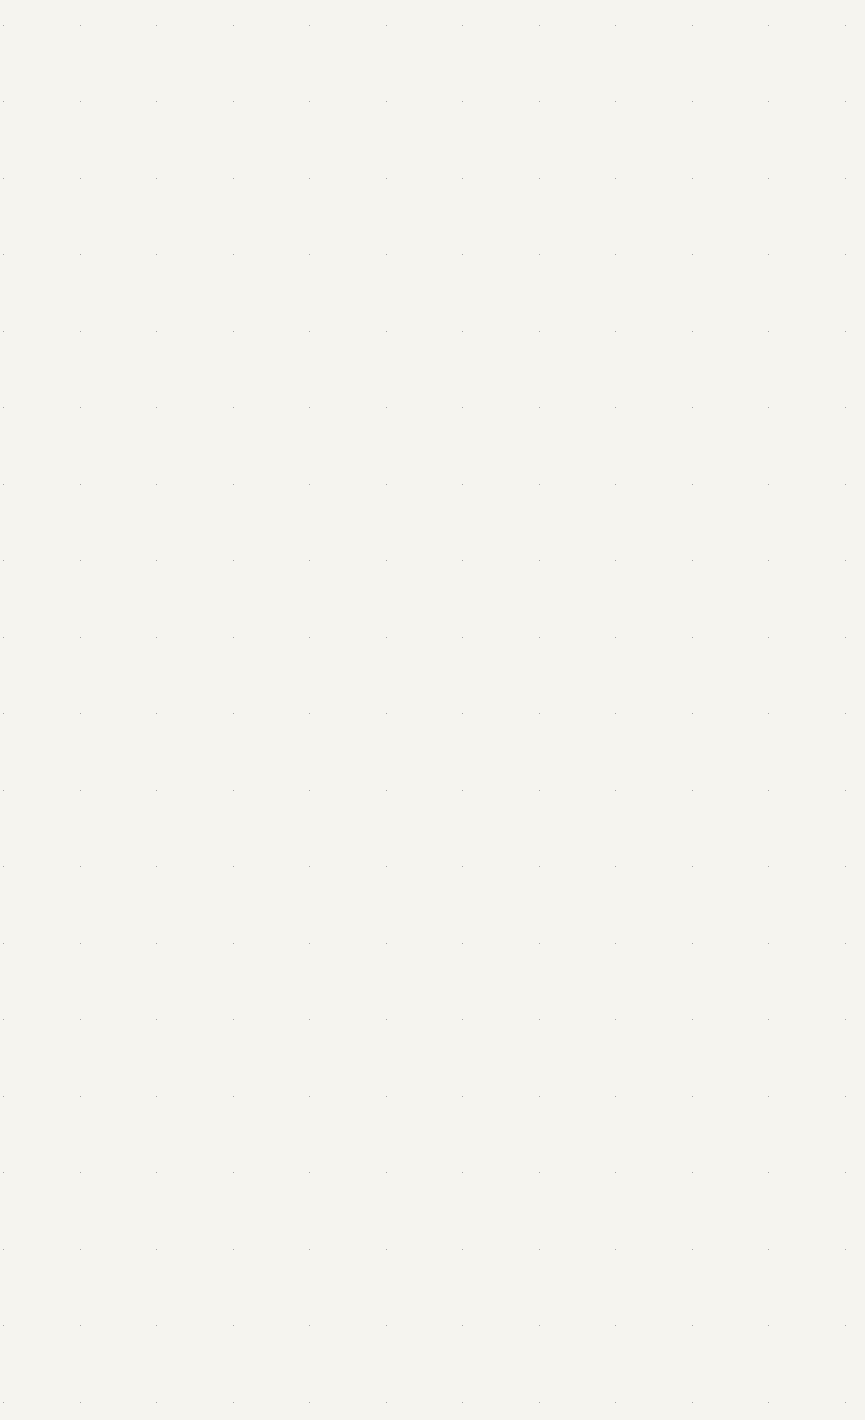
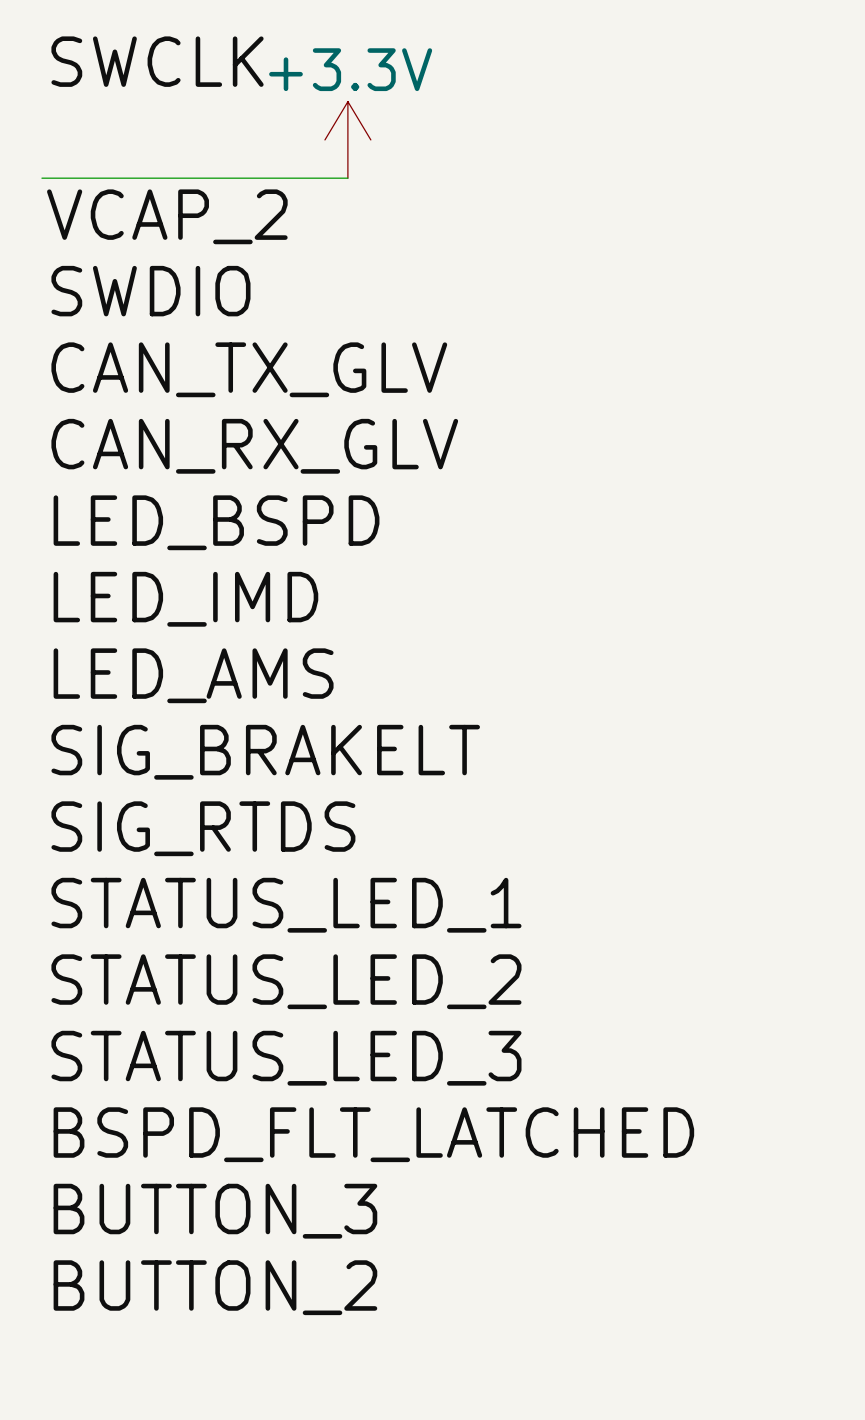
label: none -> SWCLK (157, 61)
power symbol: none -> +3.3V (347, 139)
wire: none -> (41, 178) (347, 178)
label: none -> VCAP_2 (167, 216)
label: none -> SWDIO (150, 291)
label: none -> CAN_TX_GLV (249, 369)
label: none -> CAN_RX_GLV (254, 446)
label: none -> LED_BSPD (216, 522)
label: none -> LED_IMD (185, 599)
label: none -> LED_AMS (193, 675)
label: none -> SIG_BRAKELT (265, 752)
label: none -> SIG_RTDS (203, 828)
label: none -> STATUS_LED_1 (286, 905)
label: none -> STATUS_LED_2 (286, 981)
label: none -> STATUS_LED_3 (286, 1058)
label: none -> BSPD_FLT_LATCHED (373, 1134)
label: none -> BUTTON_3 (215, 1211)
label: none -> BUTTON_2 (215, 1287)

